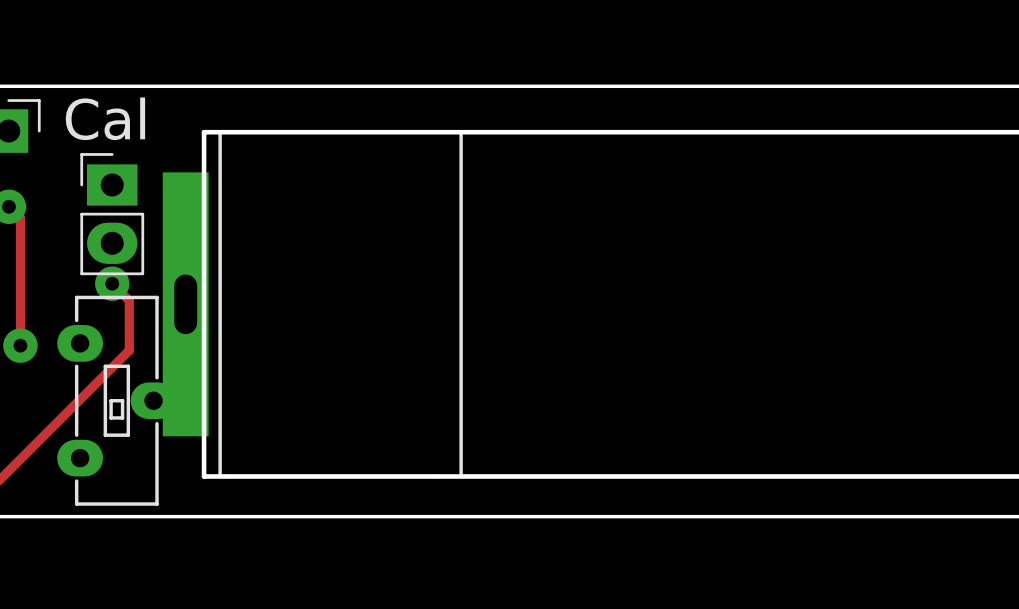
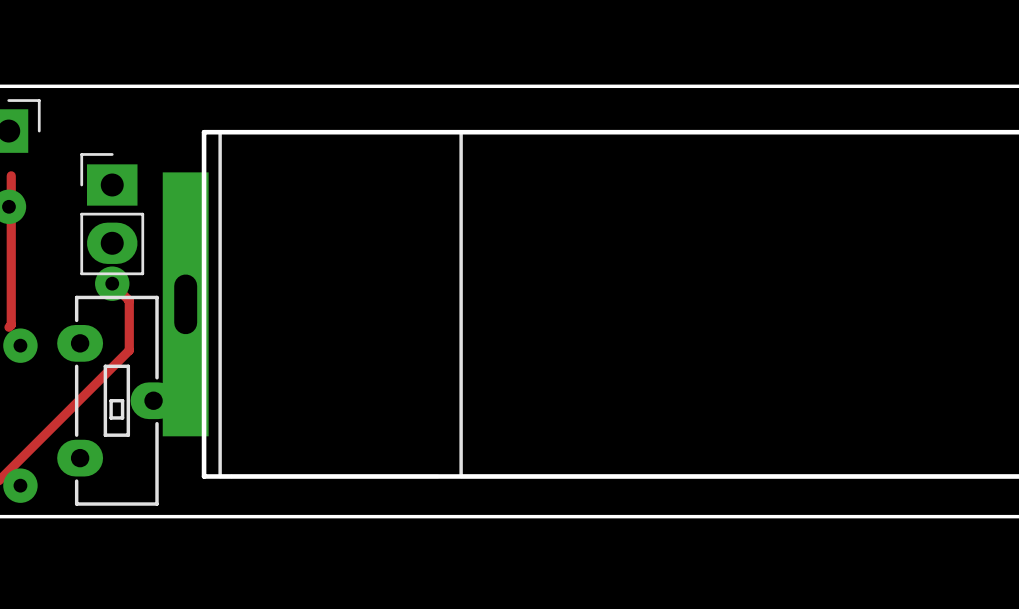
text: Cal (105, 118) -> none
track: none -> (11, 175) (11, 325) (8, 327)
track: (8, 206) (20, 218) (20, 345) -> none
via: none -> (20, 485)

